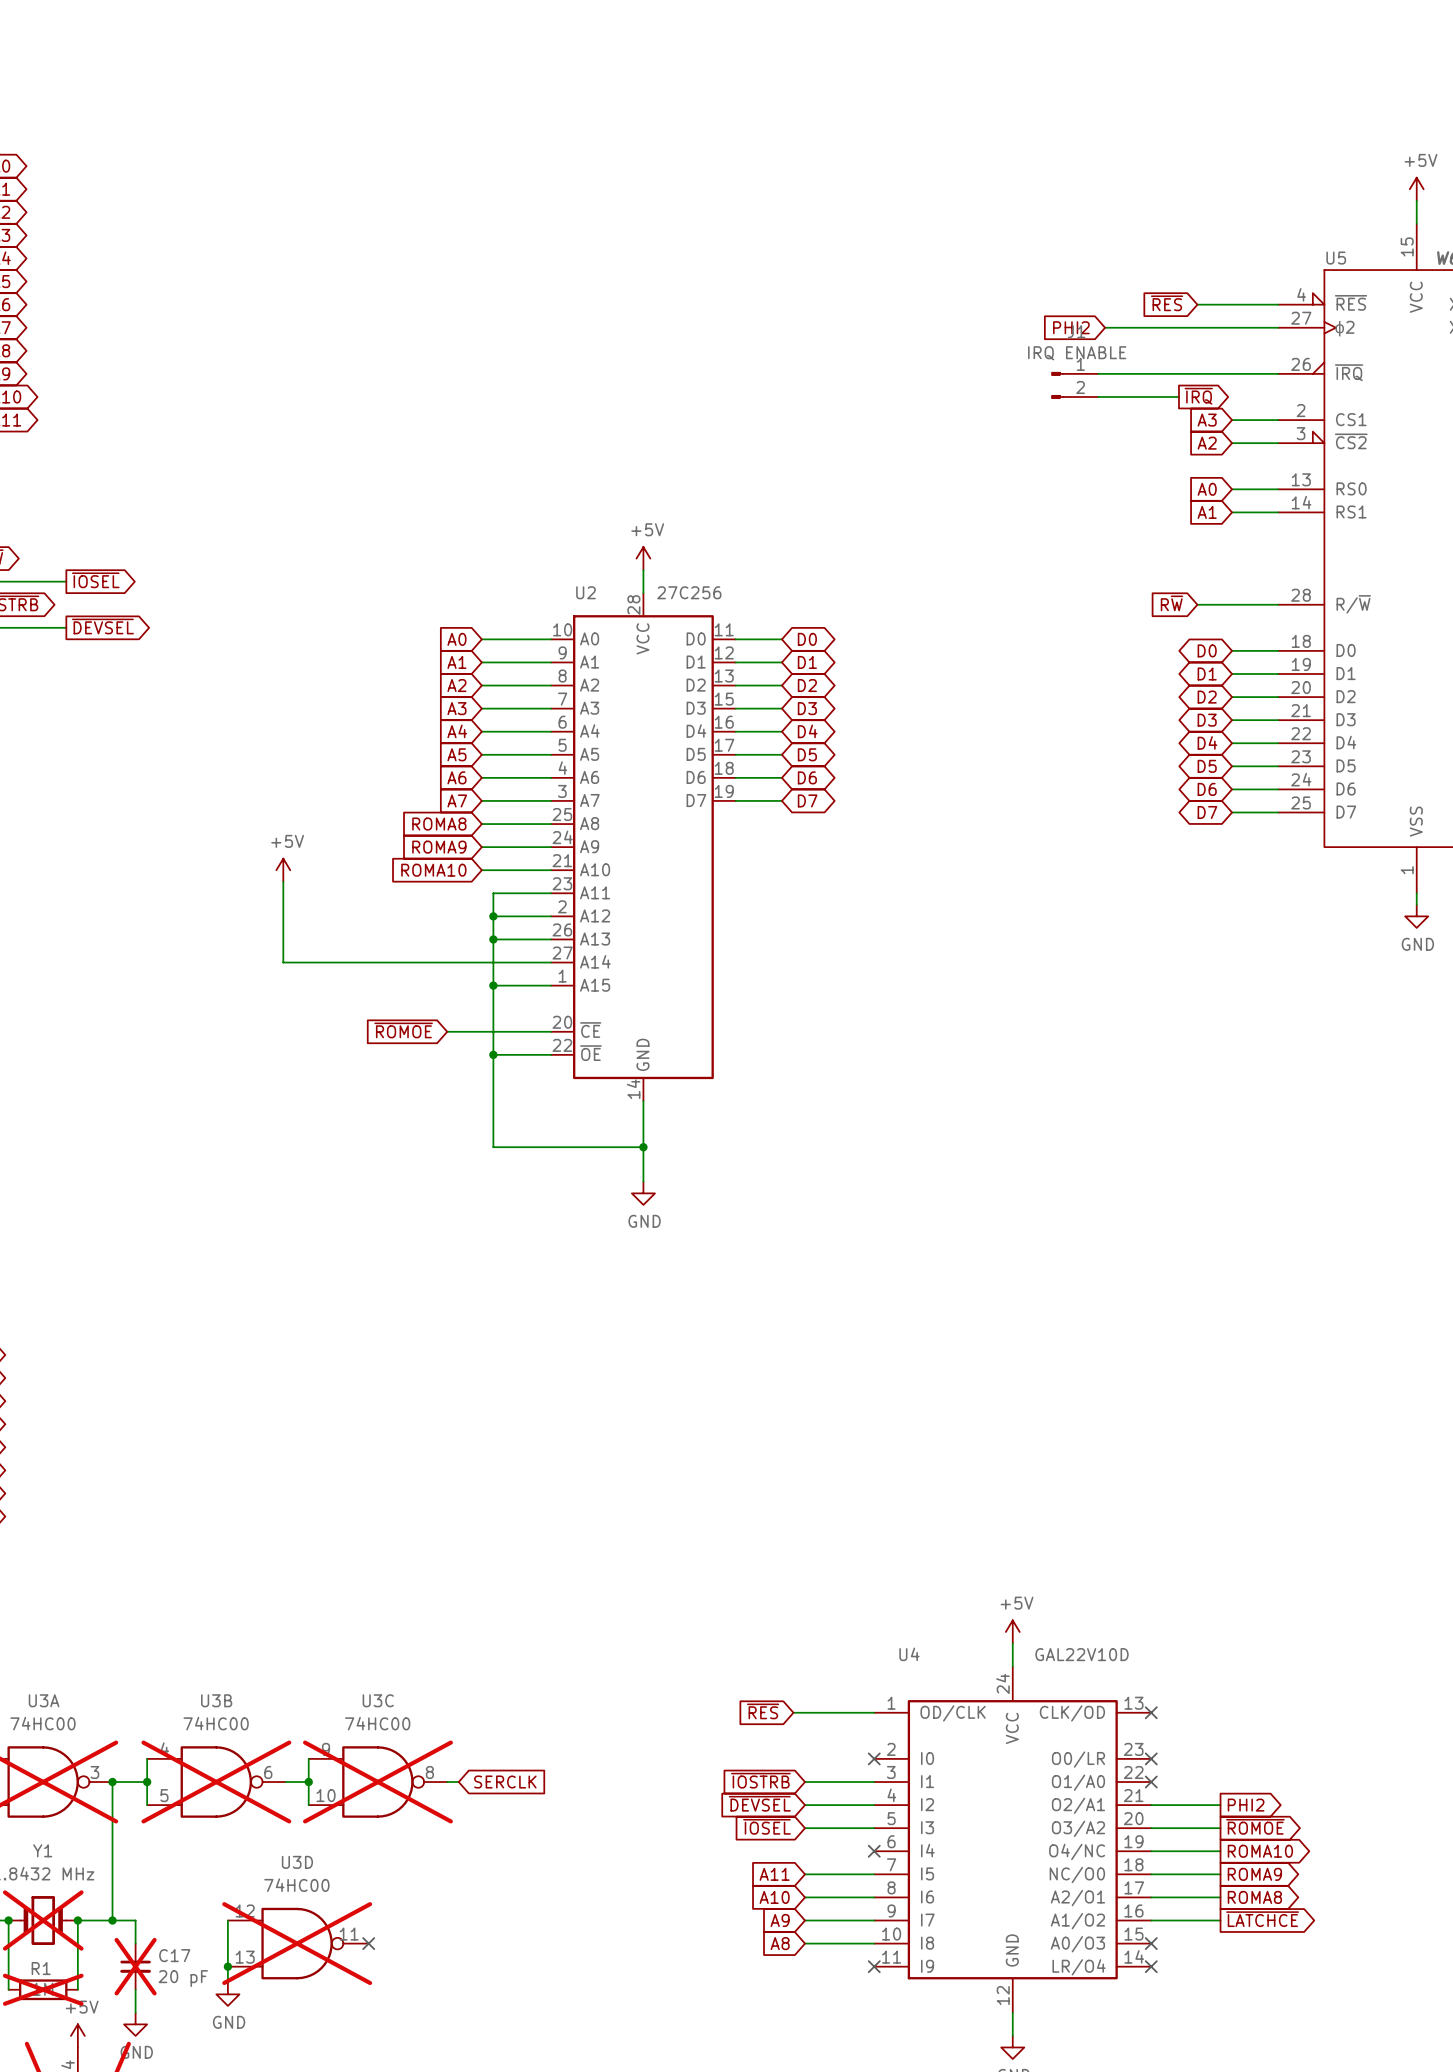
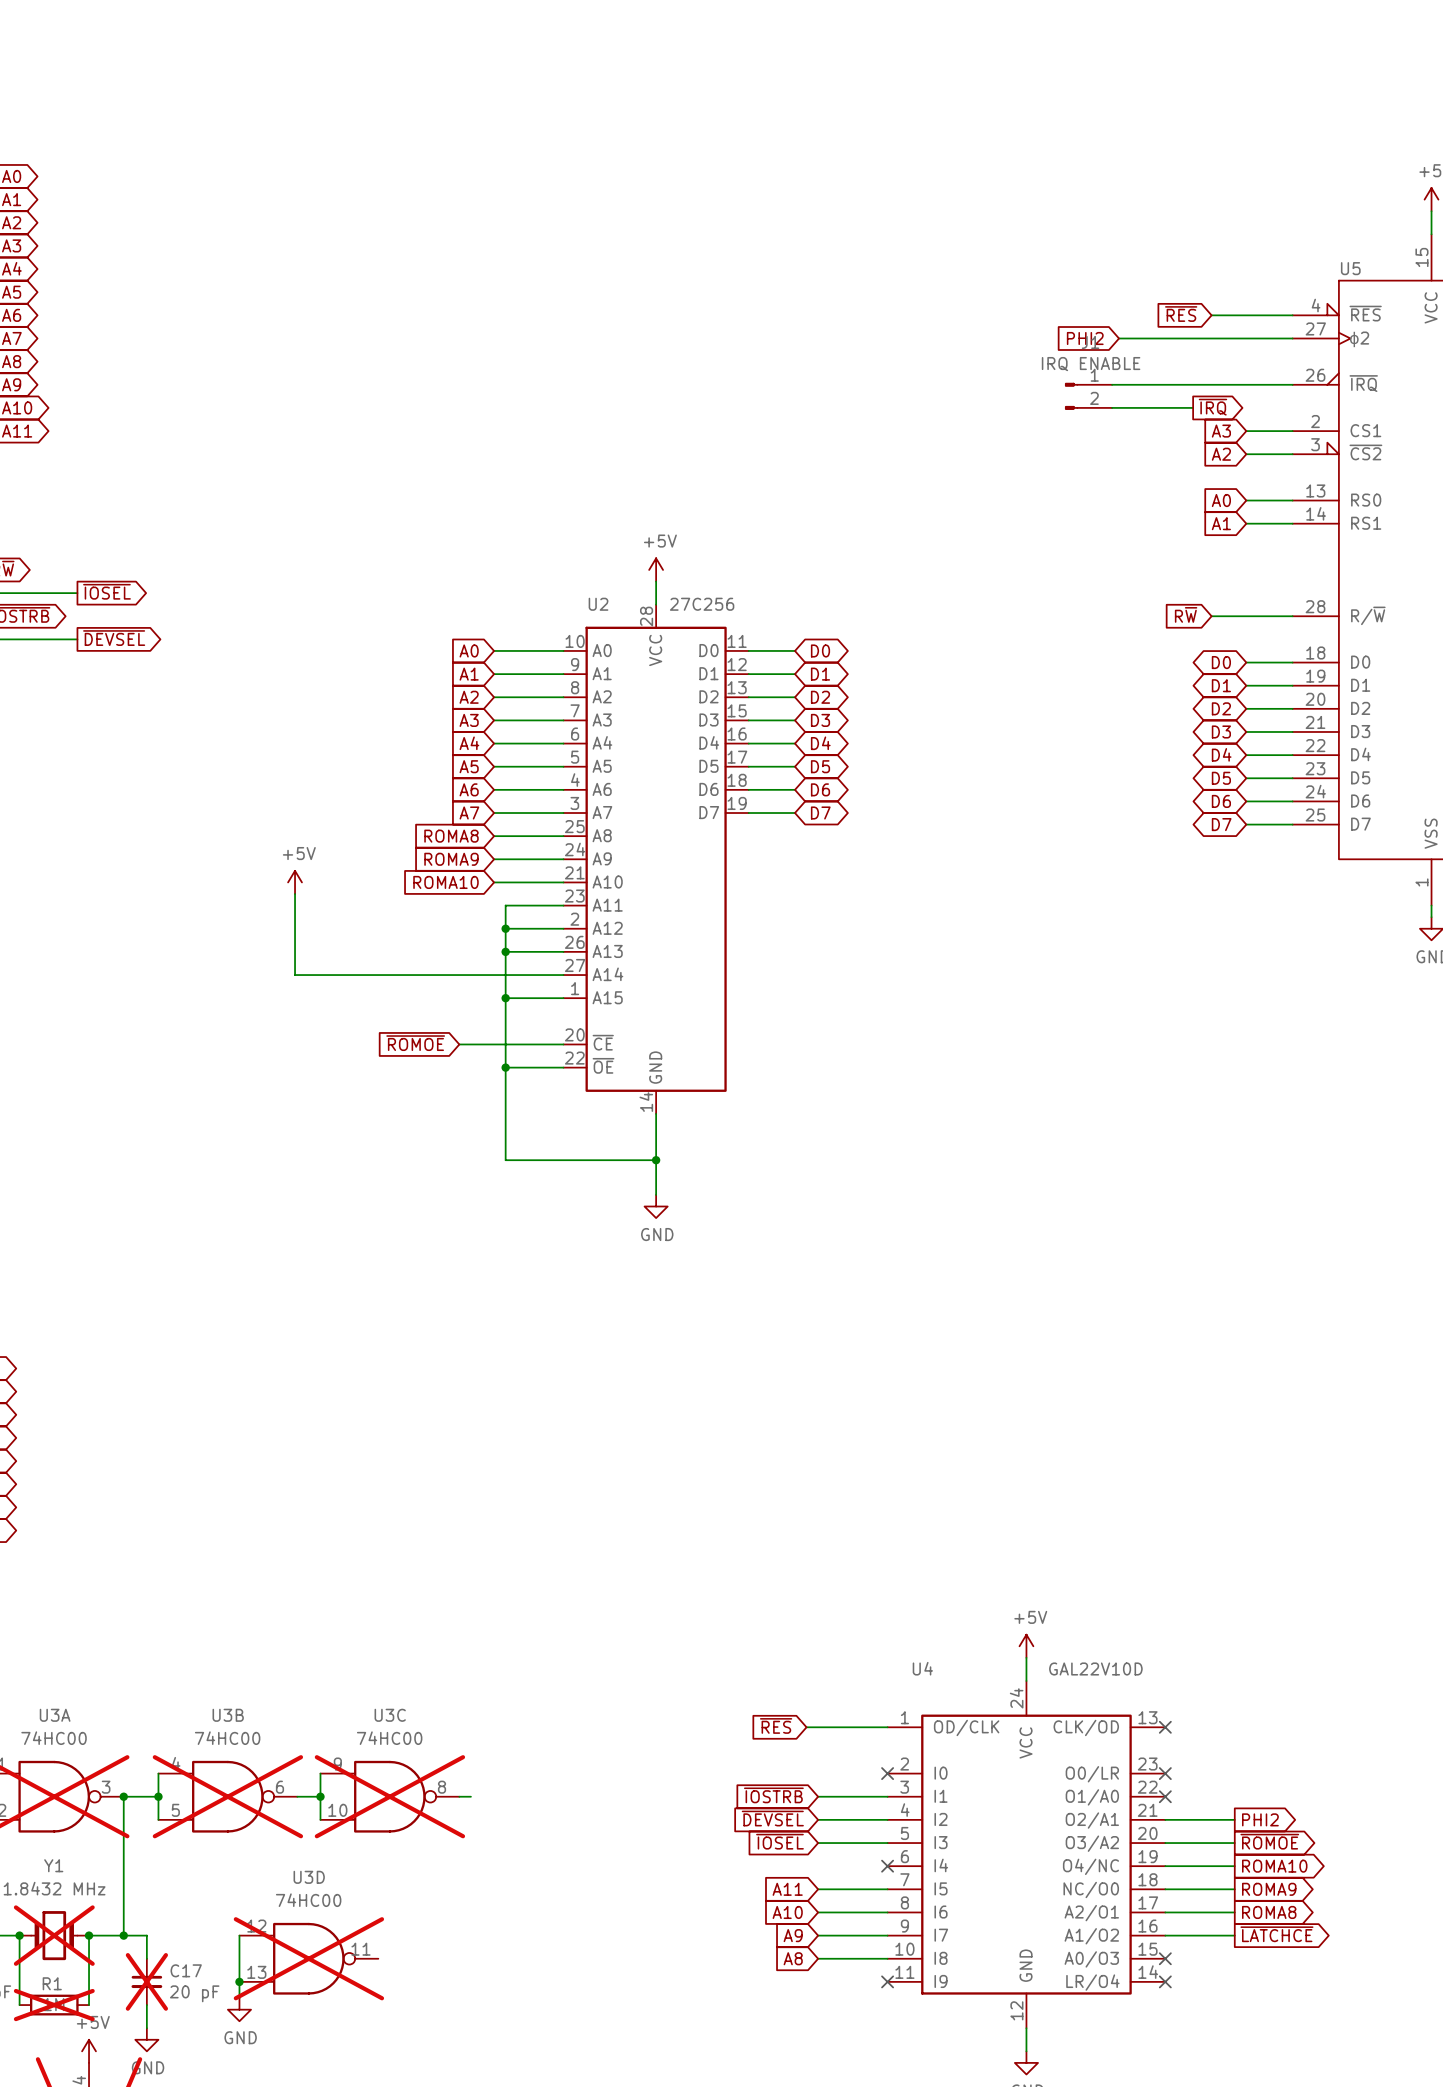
global label: SERCLK (505, 1782) -> none
no-connect mark: (368, 1943) -> none

